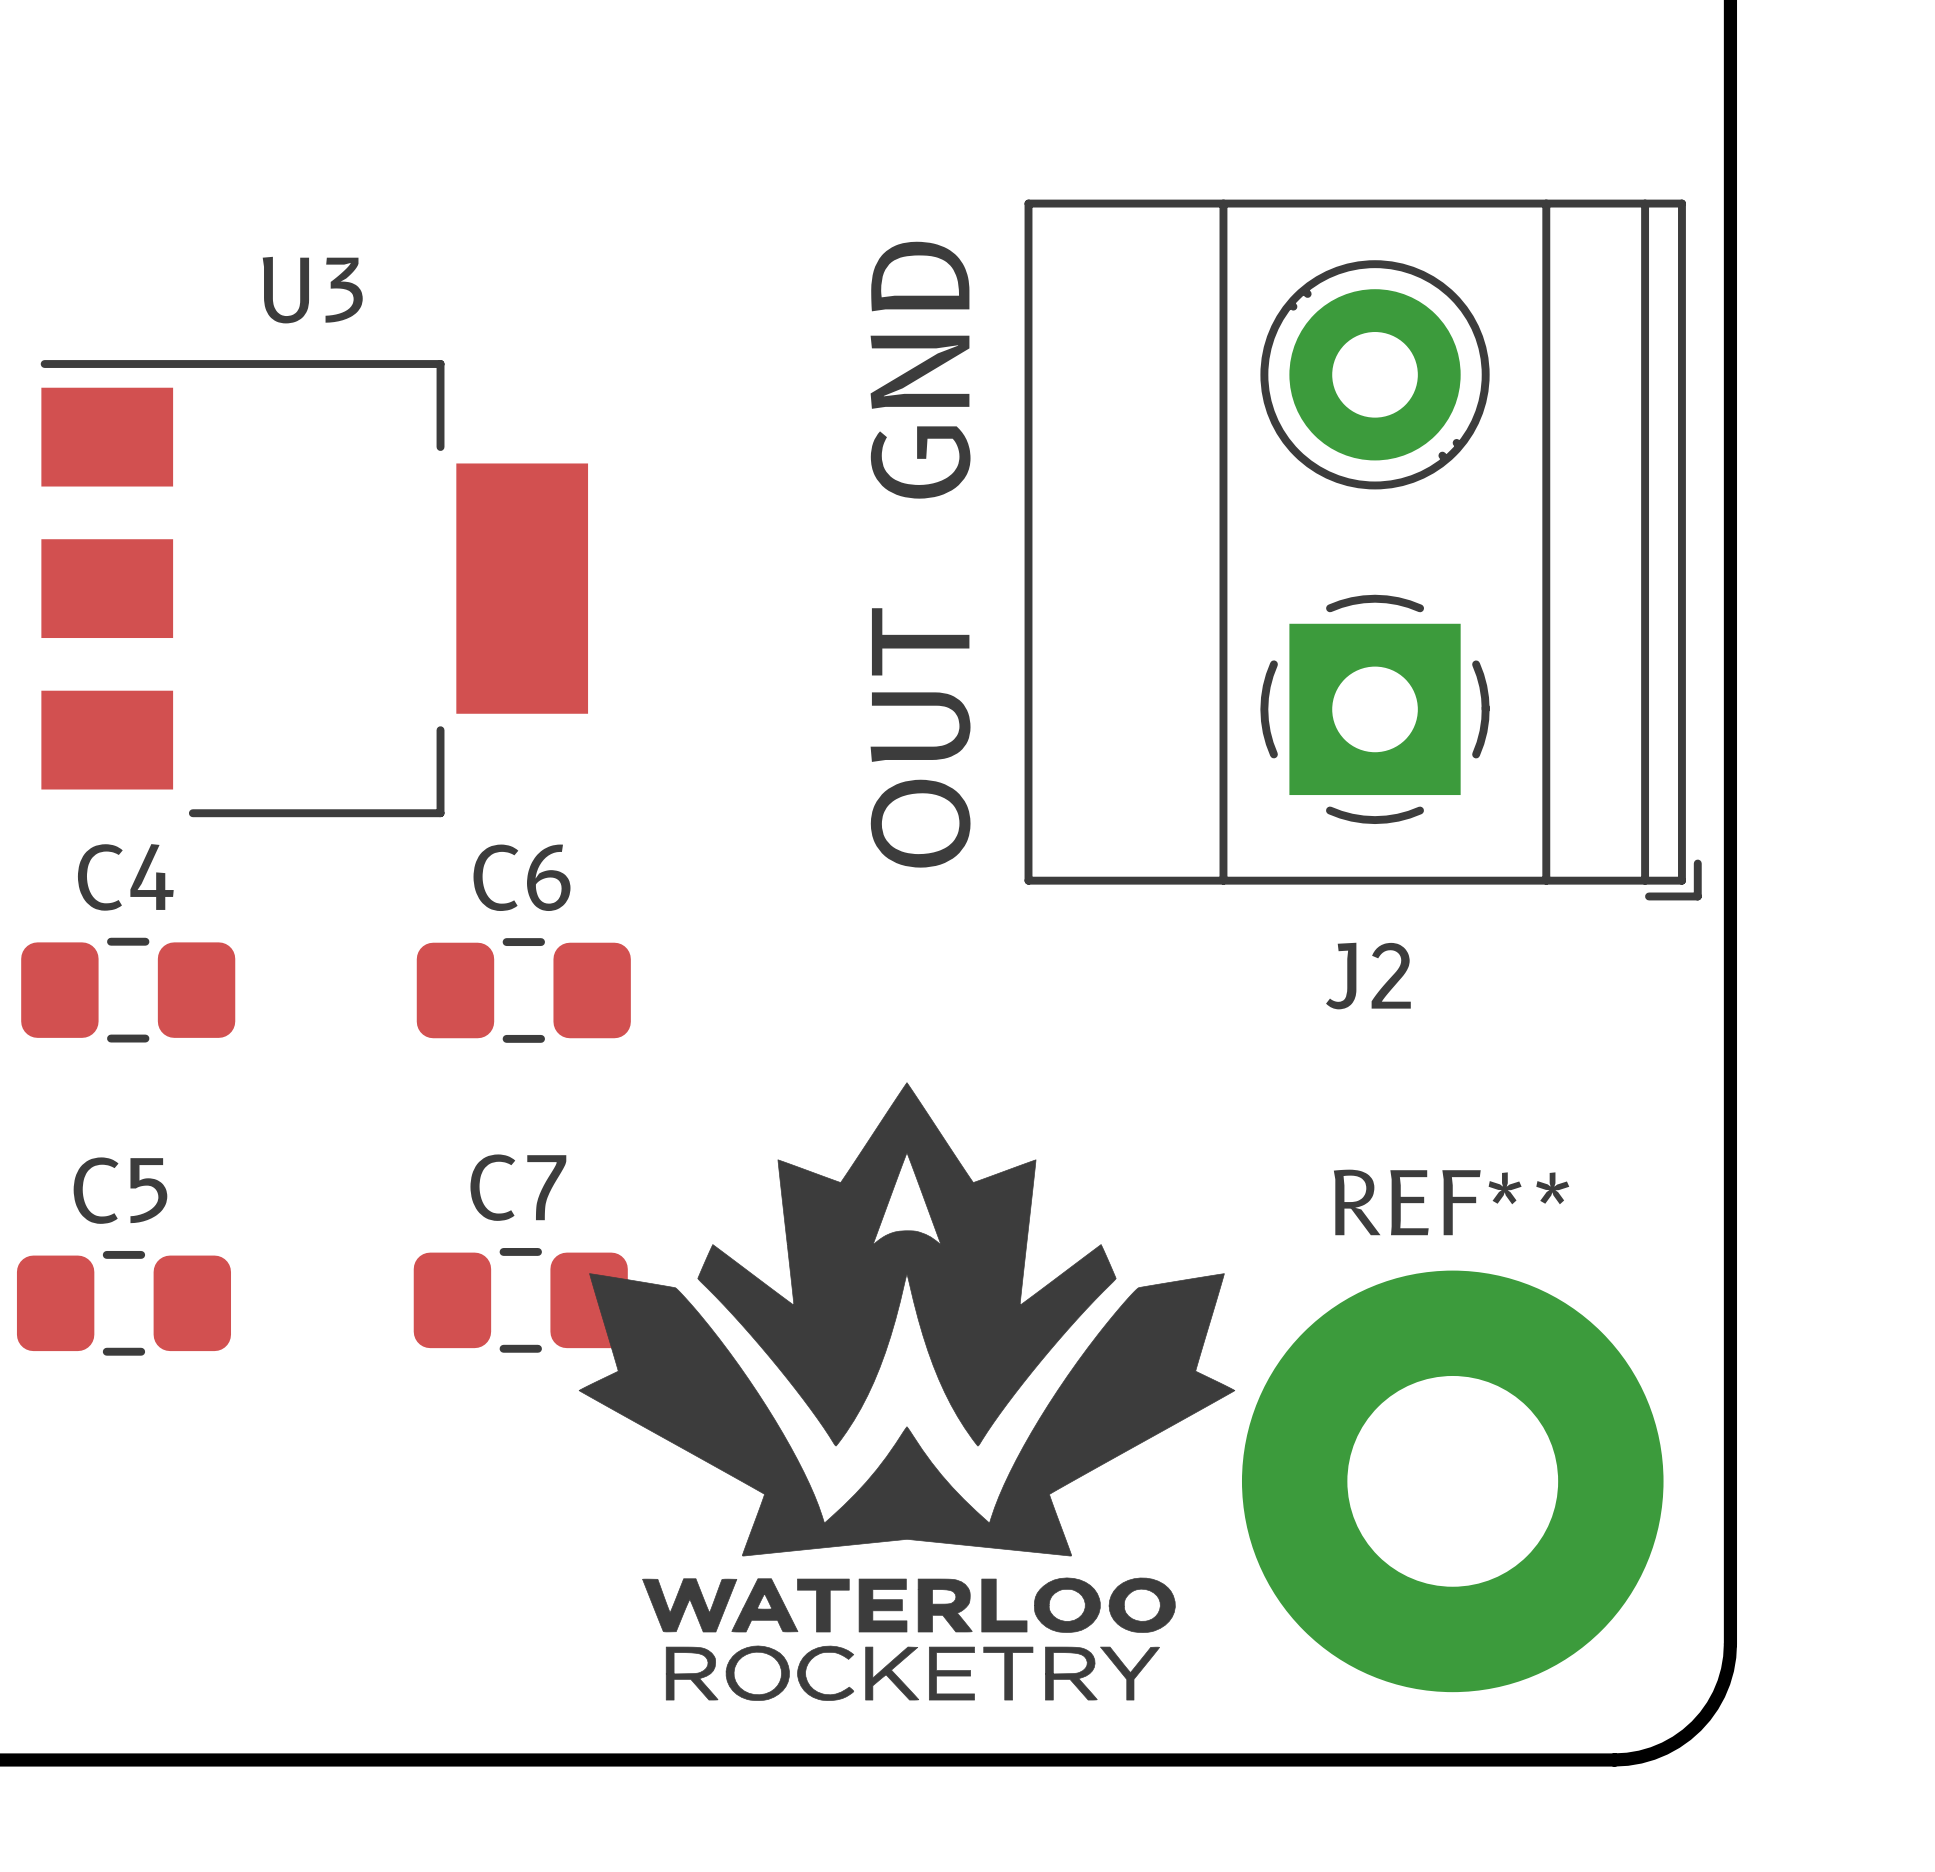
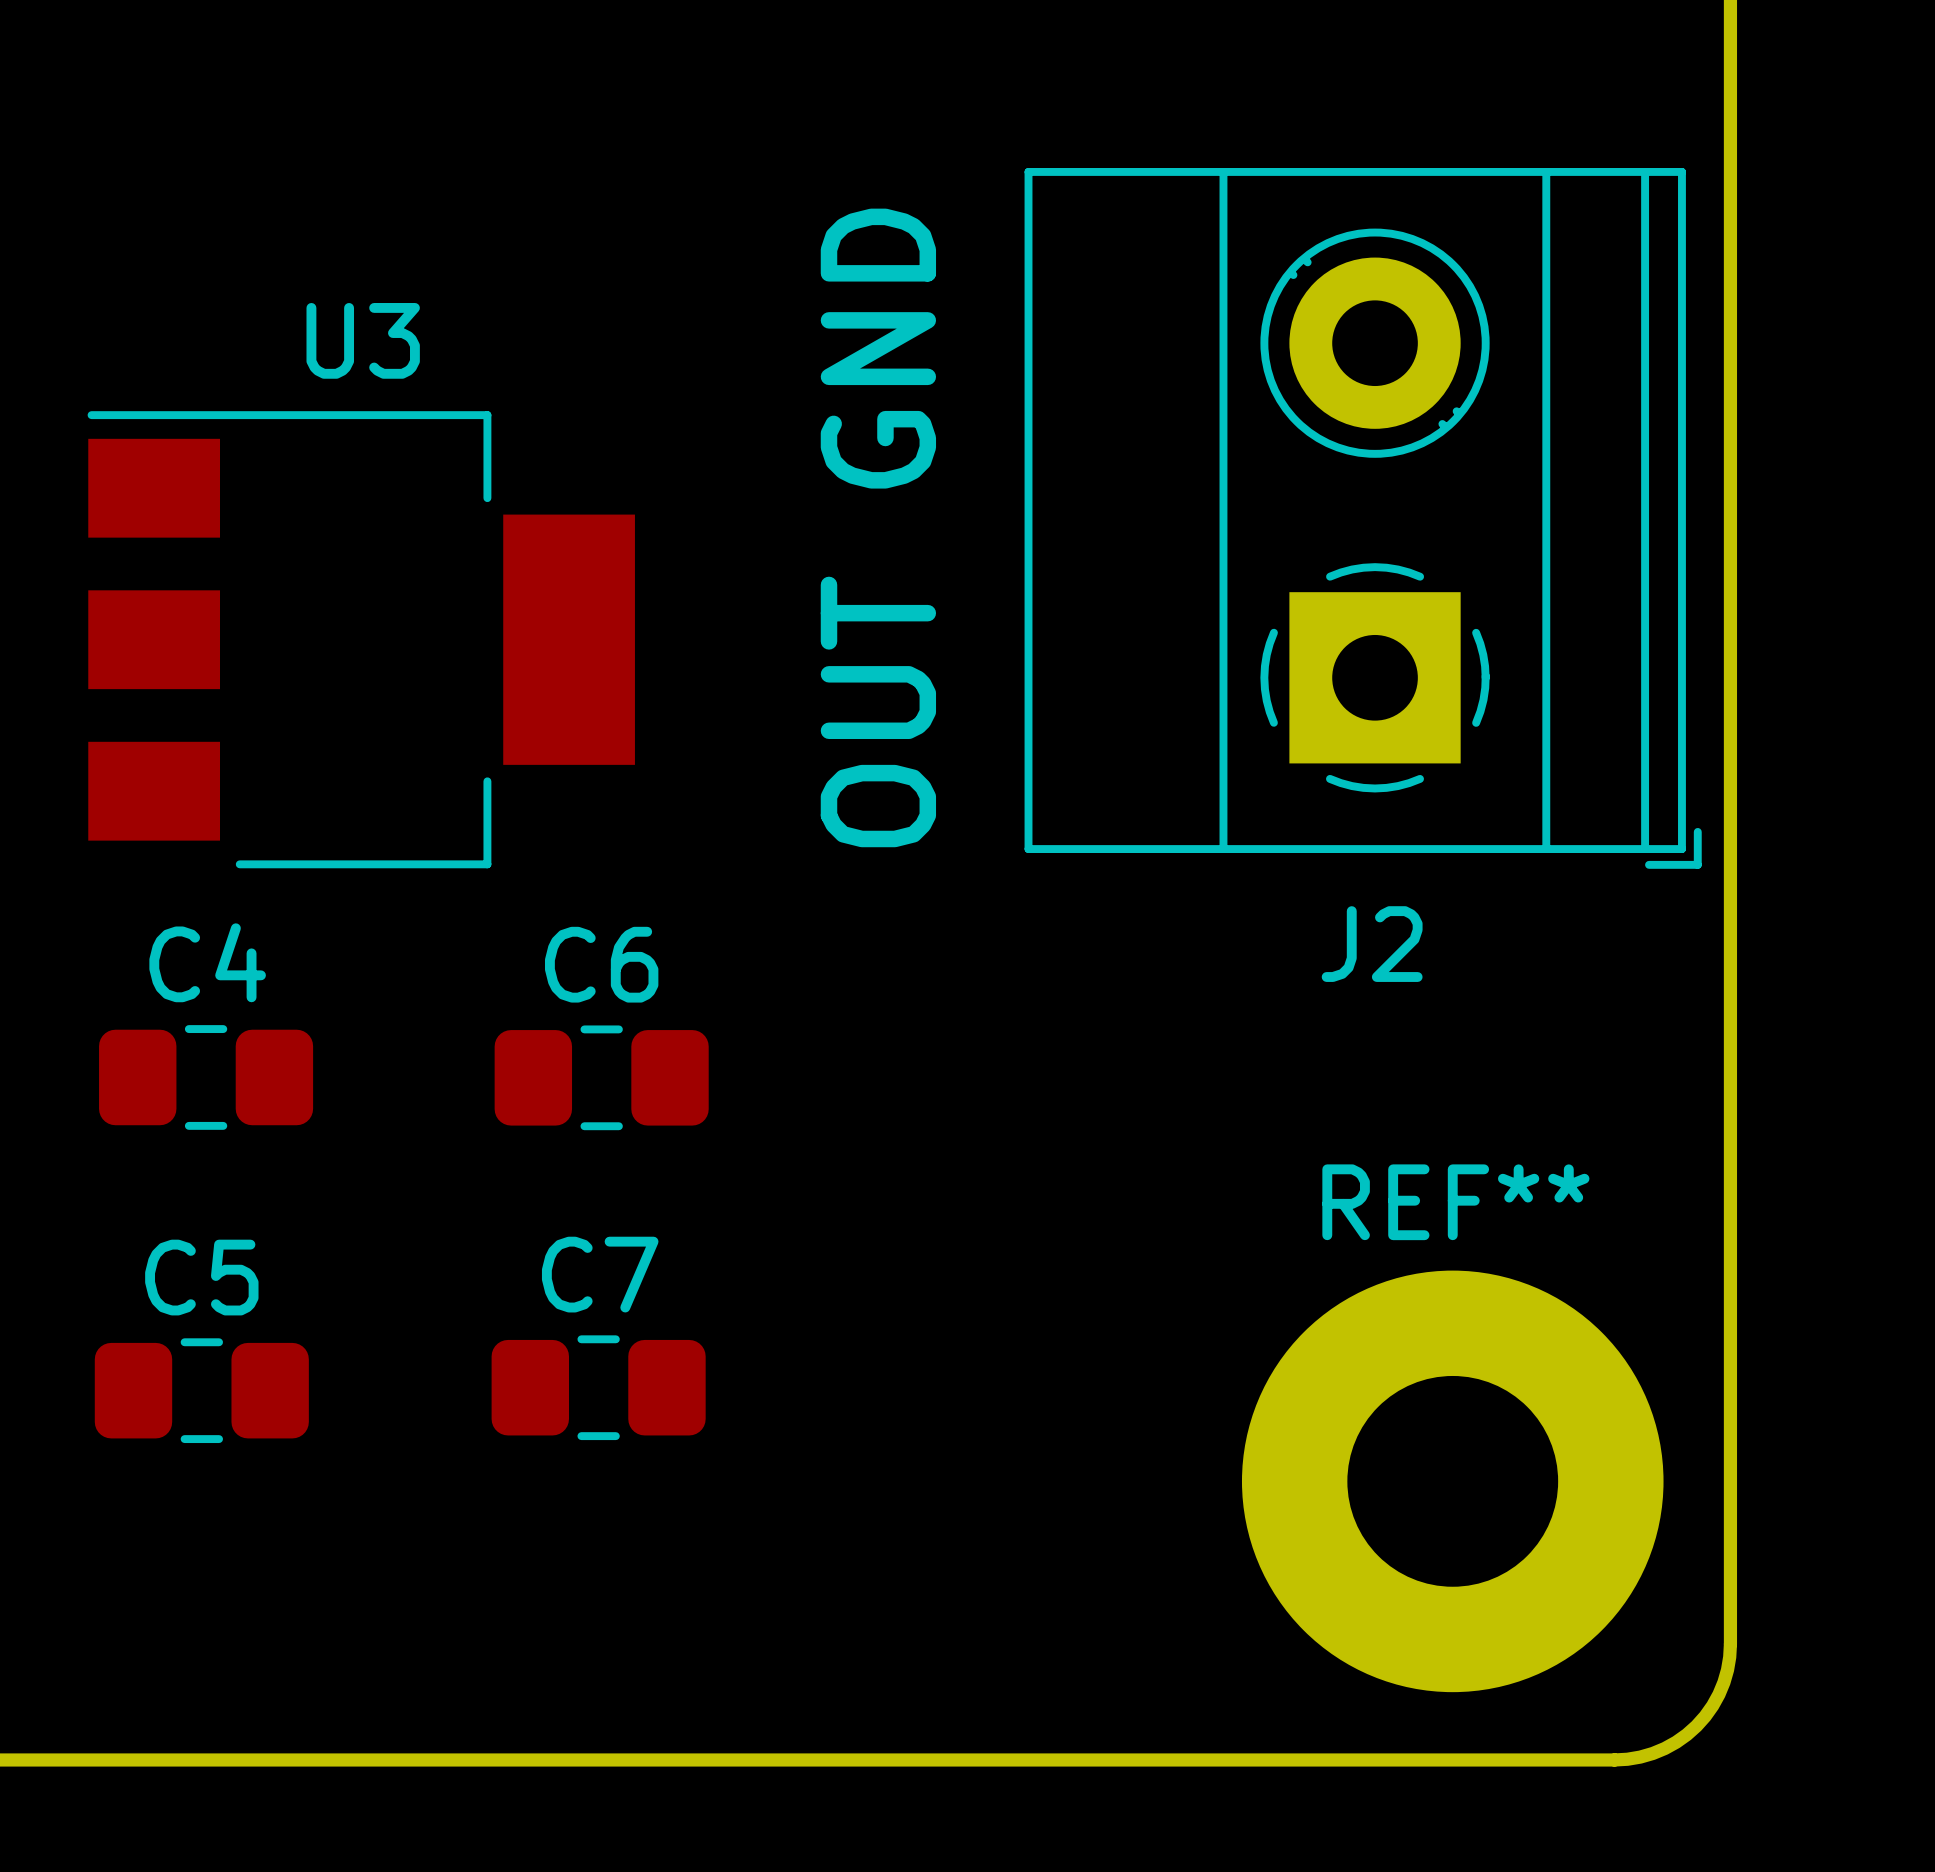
text position: GND (920, 370) -> GND (878, 348)
J2 position: (1363, 550) -> (1363, 518)
U3 position: (314, 588) -> (361, 639)
text position: OUT (920, 737) -> OUT (878, 711)
C4 position: (128, 990) -> (206, 1077)
C6 position: (523, 990) -> (601, 1077)
drawing: [578, 1082, 1236, 1701] -> none
C7 position: (520, 1300) -> (598, 1387)
C5 position: (123, 1303) -> (201, 1390)

